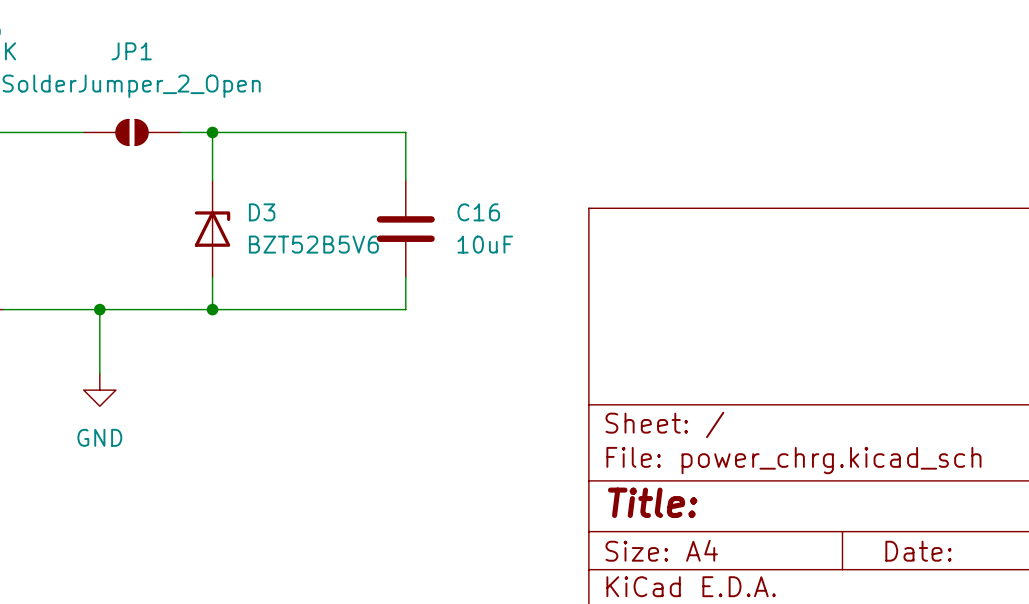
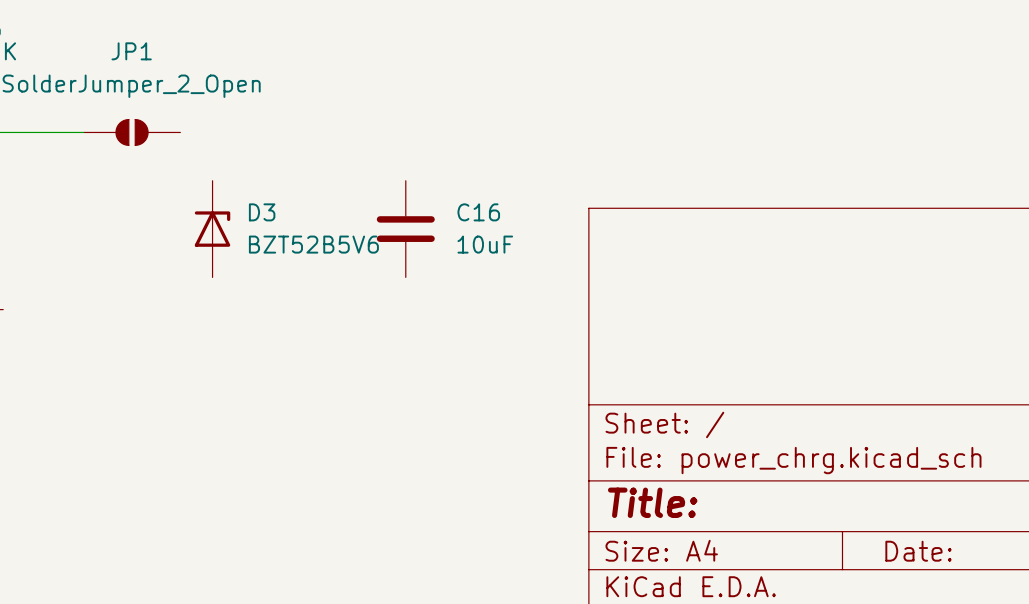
wire: (180, 132) (405, 132) (405, 180) -> none
wire: (212, 132) (212, 180) -> none
junction: (212, 132) -> none
wire: (212, 277) (212, 309) -> none
wire: (405, 277) (405, 309) (3, 309) -> none
wire: (99, 309) (99, 374) -> none
junction: (99, 309) -> none
junction: (212, 309) -> none
power symbol: GND (99, 390) -> none

